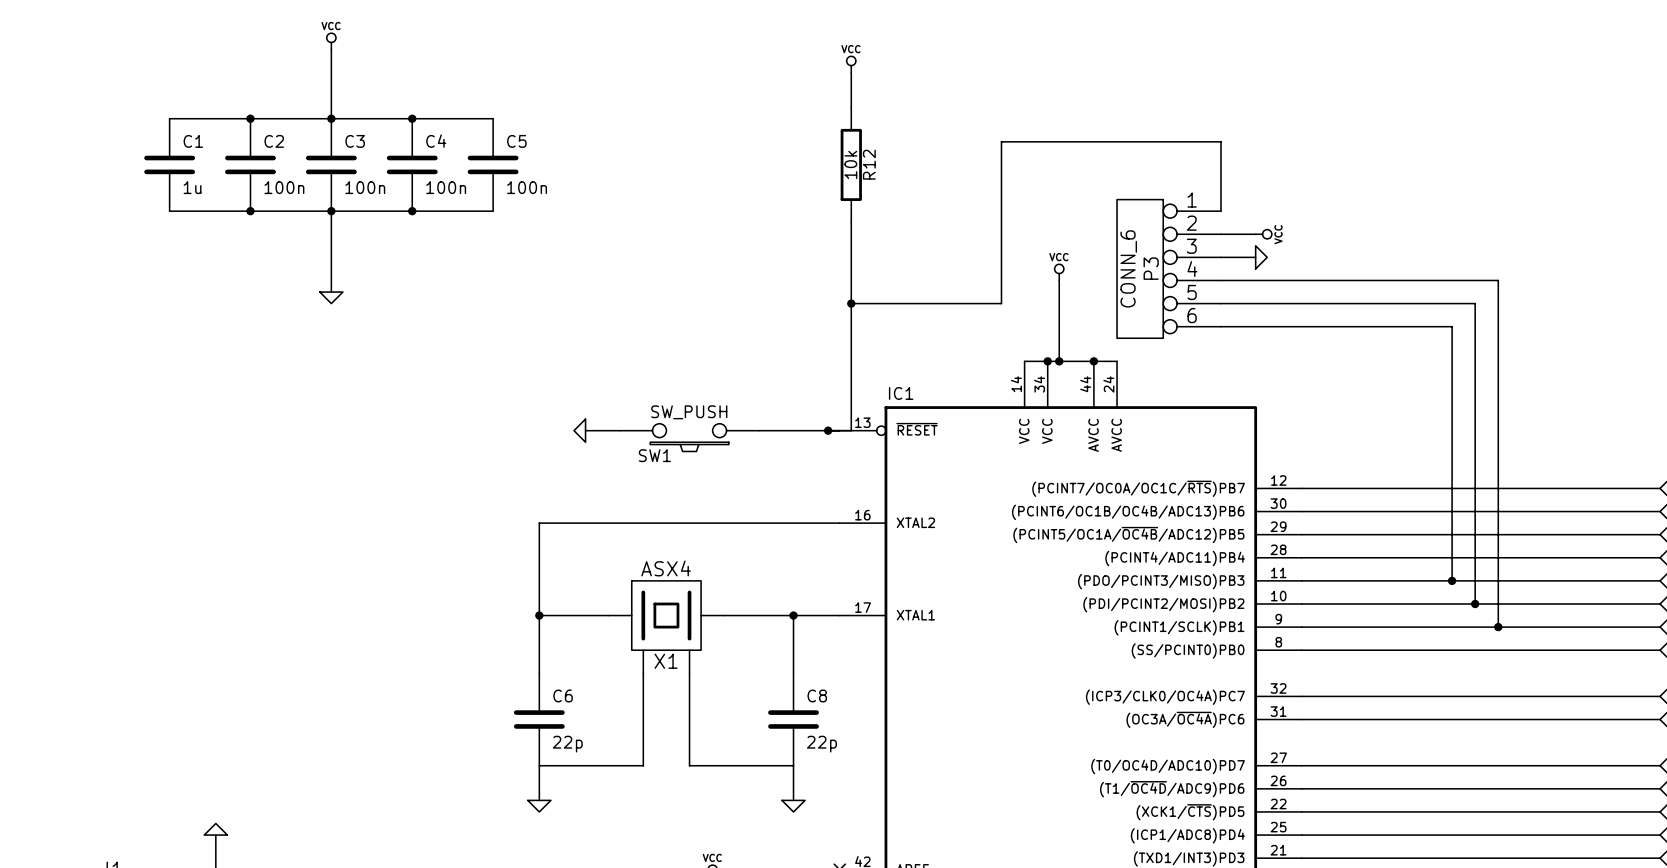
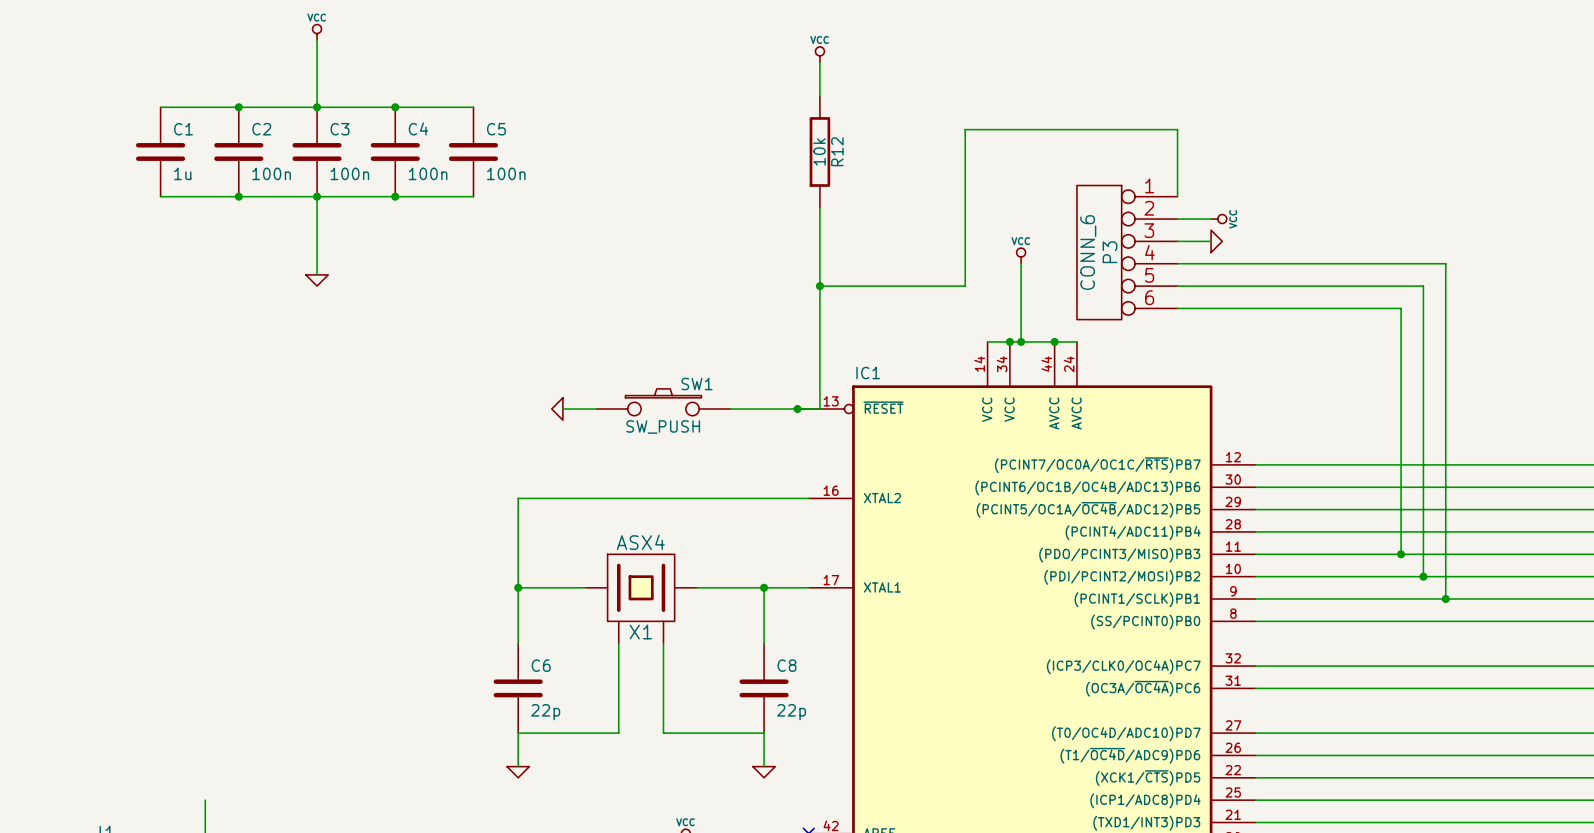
SW1 rotation: 0° (689, 446) -> 180° (663, 393)
power symbol: (215, 829) -> none

